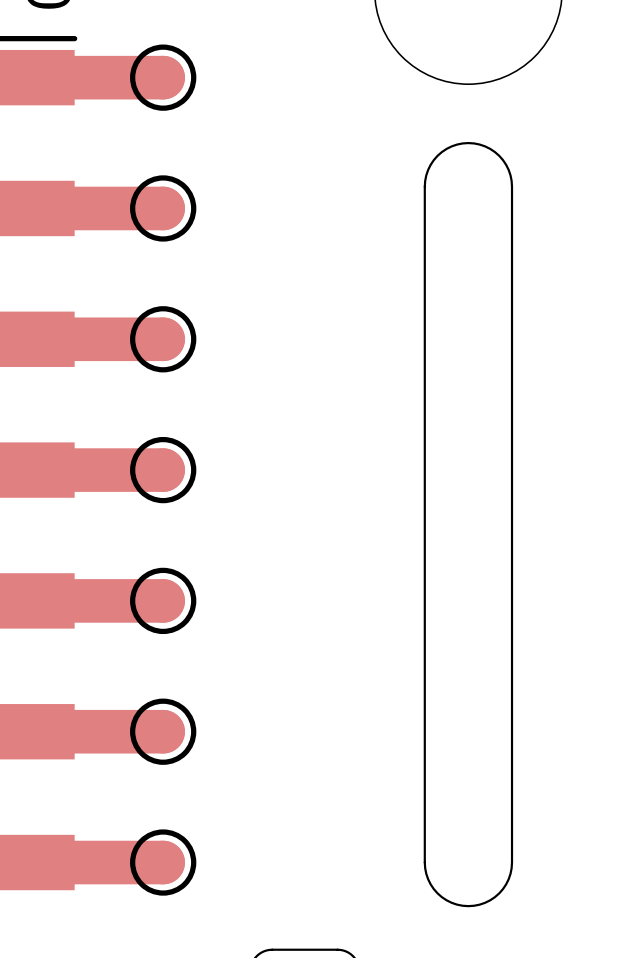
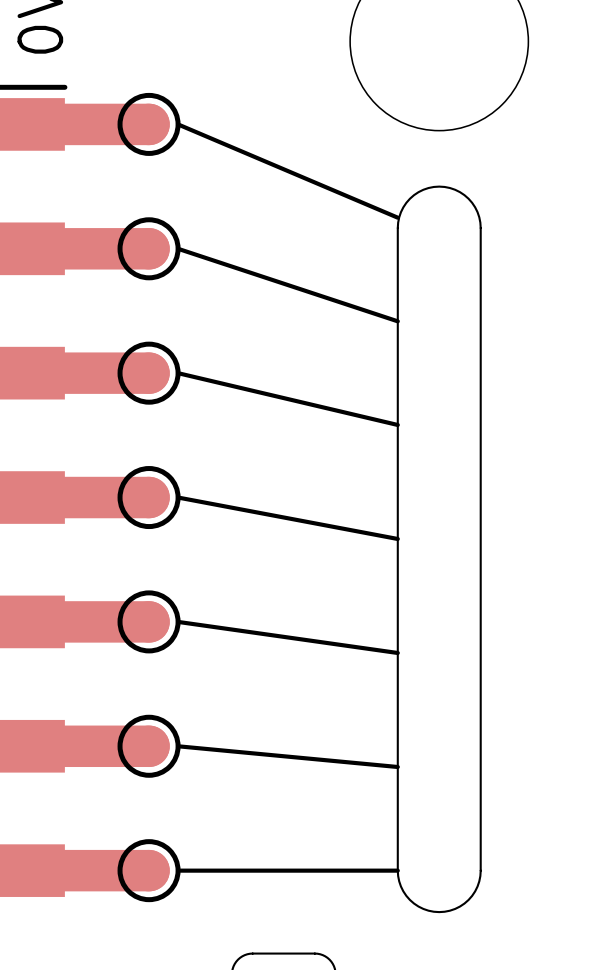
line: none -> (178, 124) (397, 217)
line: none -> (178, 248) (397, 321)
line: none -> (178, 373) (397, 424)
line: none -> (178, 497) (397, 538)
line: none -> (178, 621) (397, 652)
line: none -> (178, 746) (397, 767)
line: none -> (178, 870) (397, 870)

